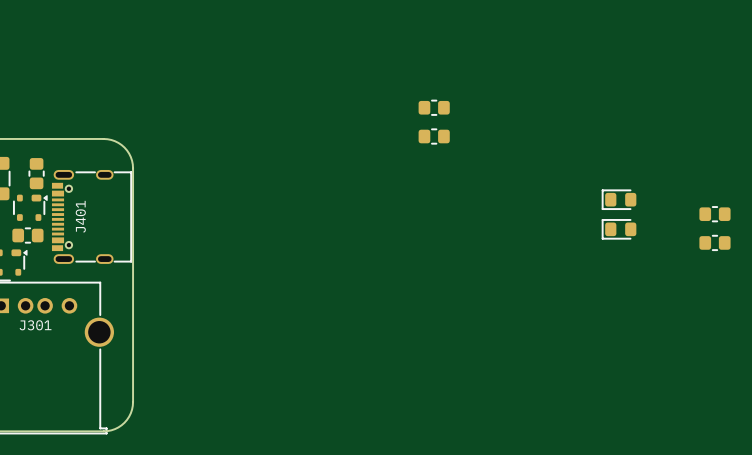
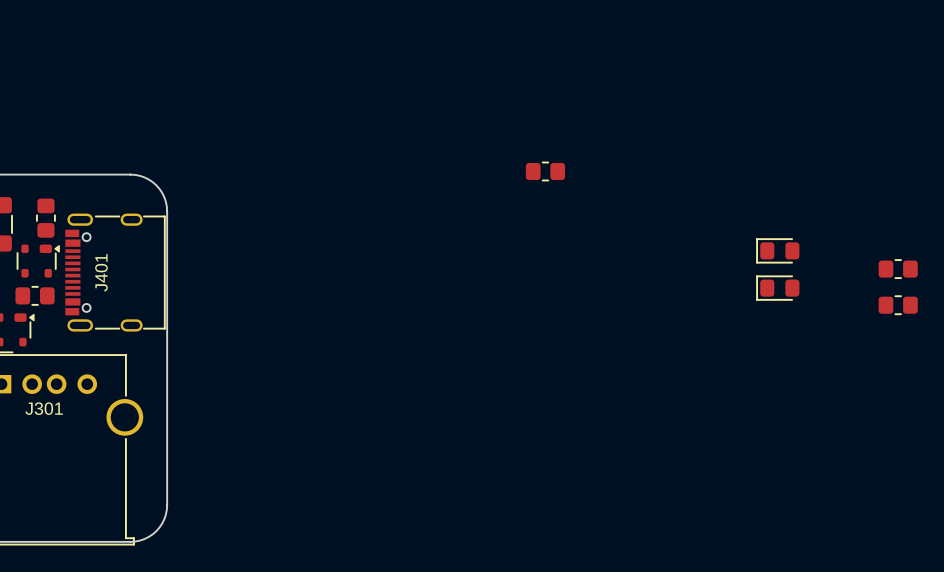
part: (434, 107) -> none

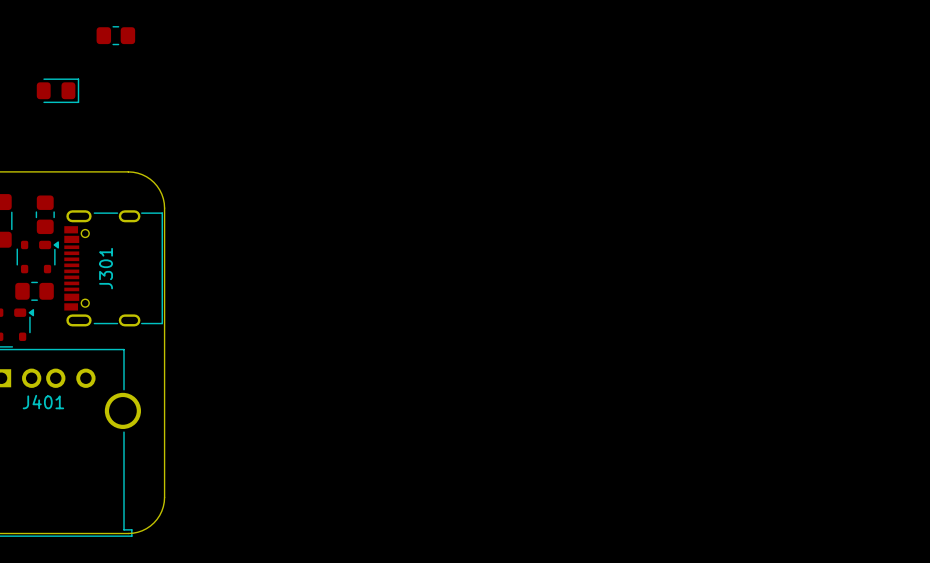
part: none -> (115, 35)
part: none -> (58, 90)
part: (545, 171) -> none
part: (777, 250) -> none
part: (898, 269) -> none
J401 name: J401 (101, 272) -> J301 (106, 268)
part: (777, 288) -> none
part: (898, 305) -> none
J301 name: J301 (44, 408) -> J401 (43, 402)

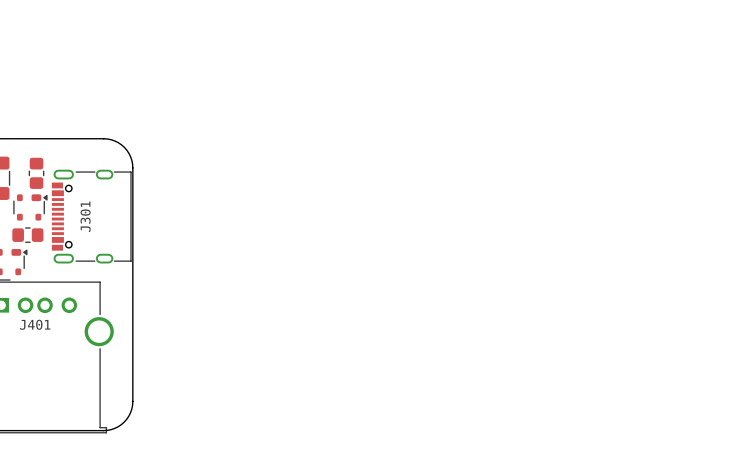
part: (115, 35) -> none
part: (58, 90) -> none

